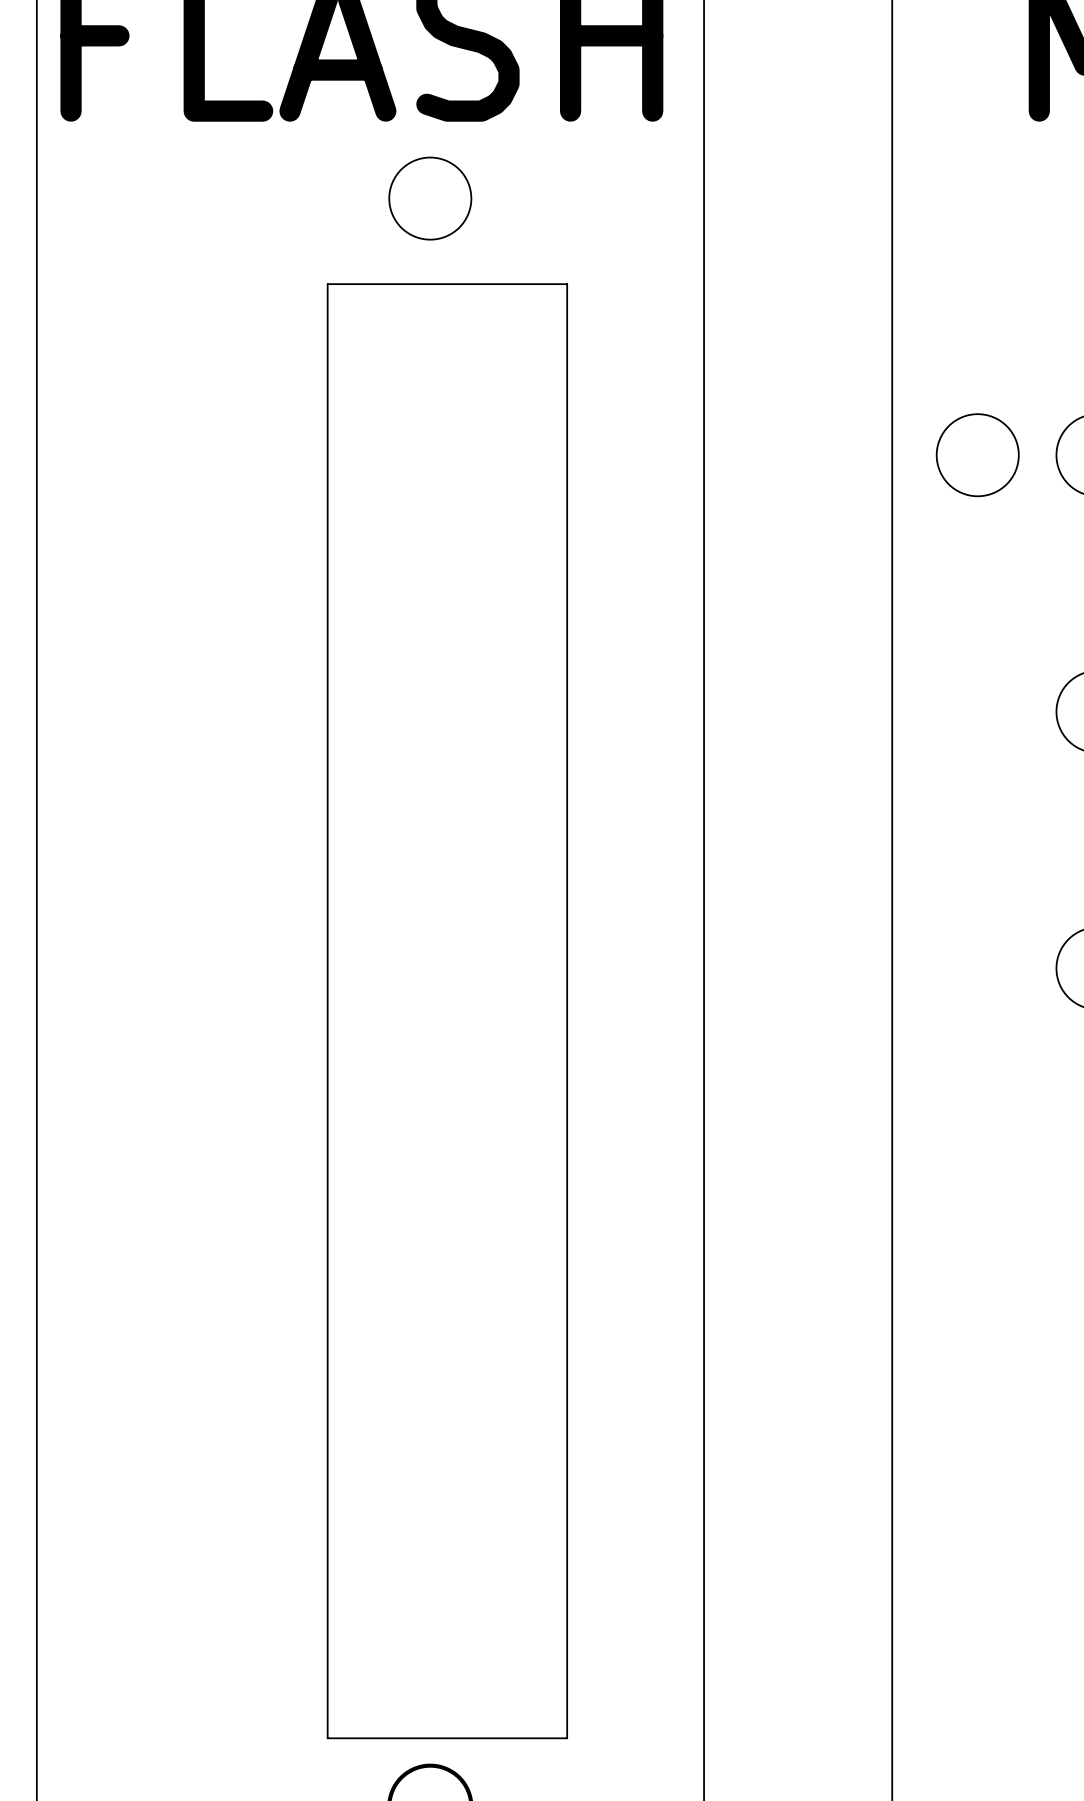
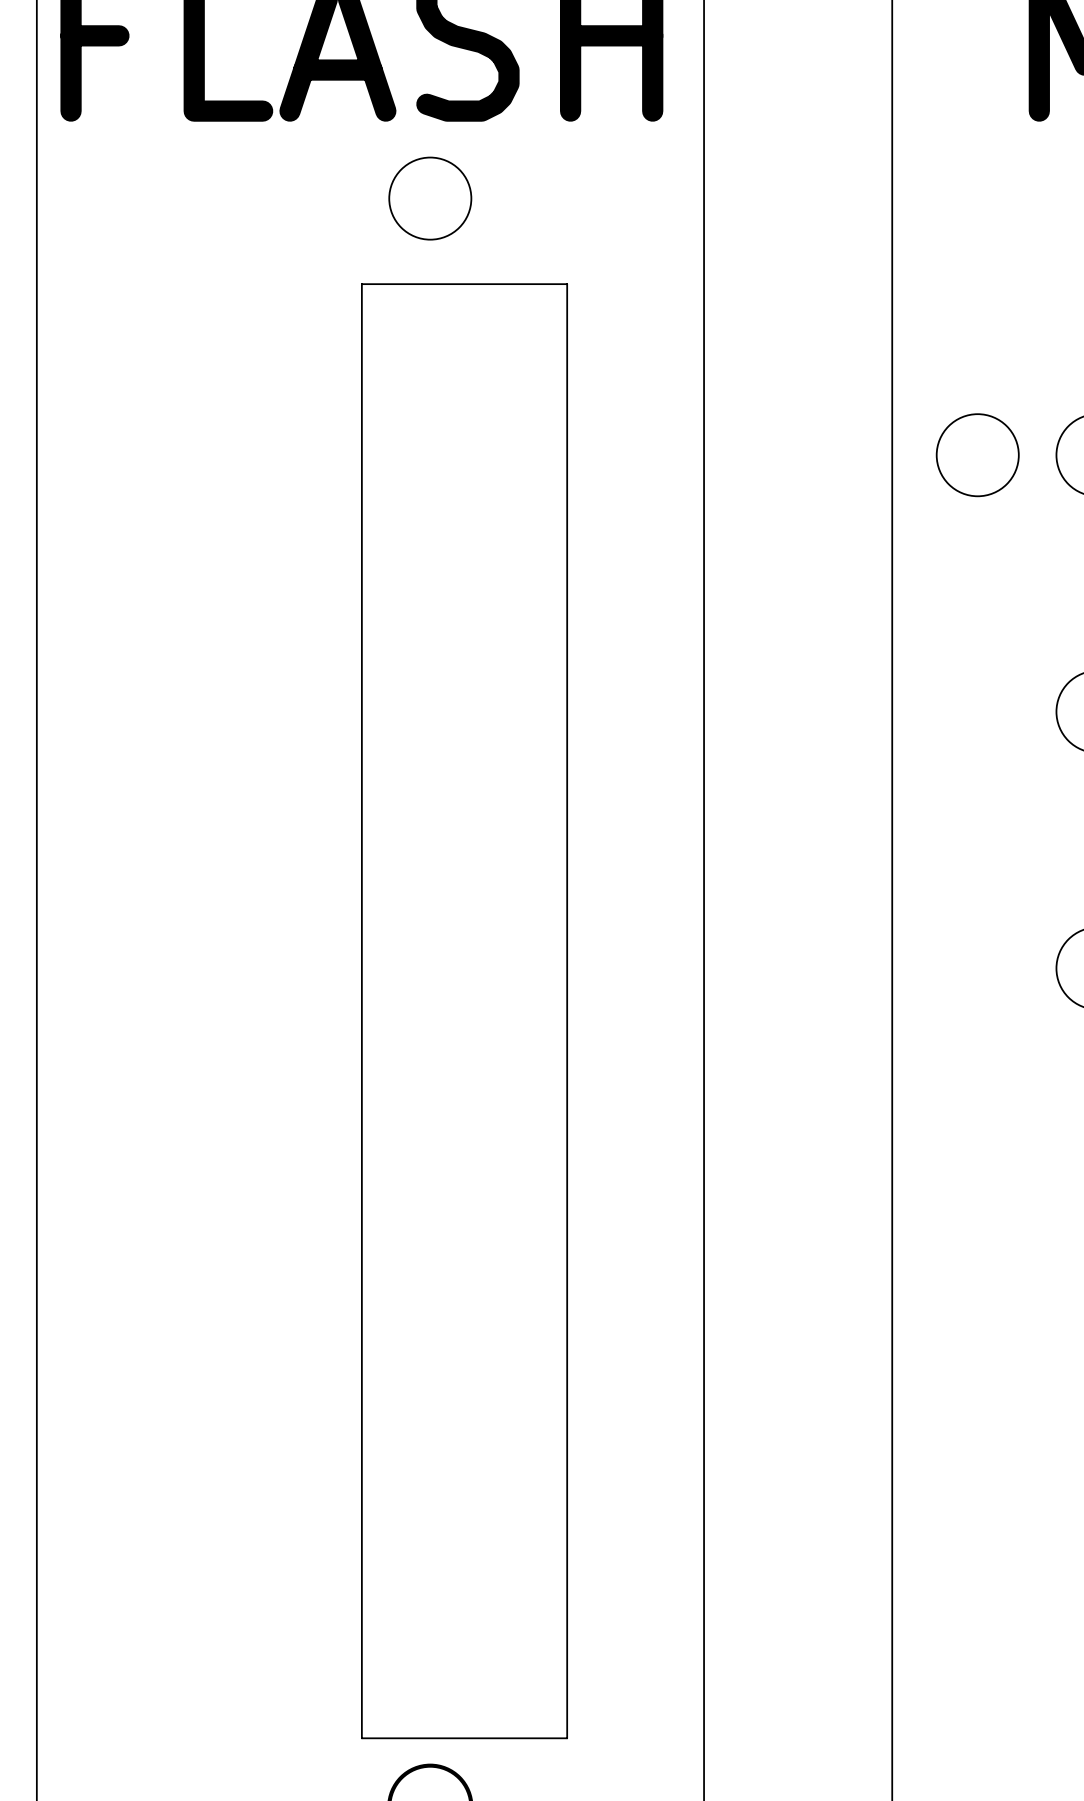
board edge: (361, 284) (327, 284) (327, 1738) (361, 1738) -> (361, 284) (361, 1738)

